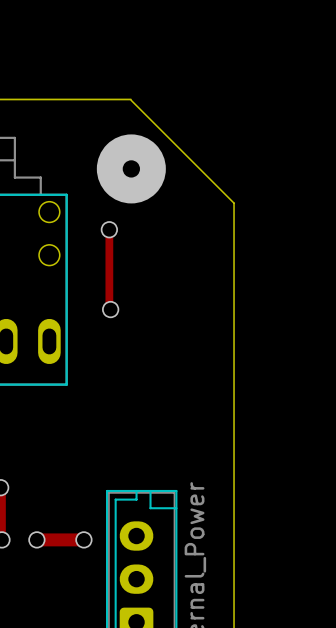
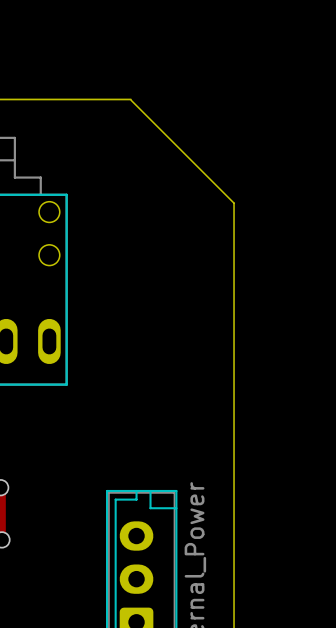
via: (131, 168) -> none
track: (109, 229) (110, 309) -> none
via: (109, 229) -> none
via: (110, 309) -> none
track: (36, 539) (83, 539) -> none
via: (36, 539) -> none
via: (83, 539) -> none

